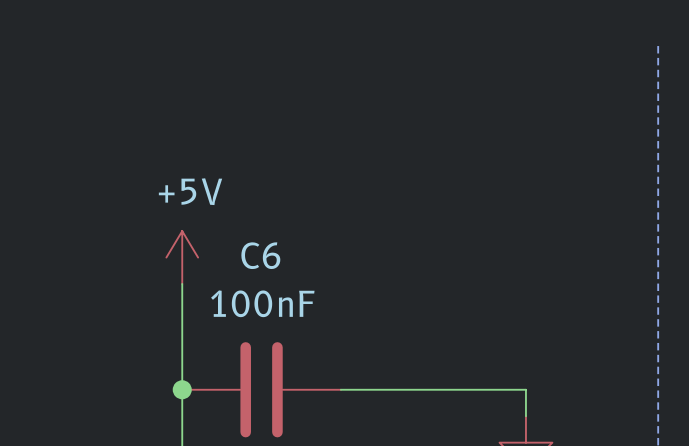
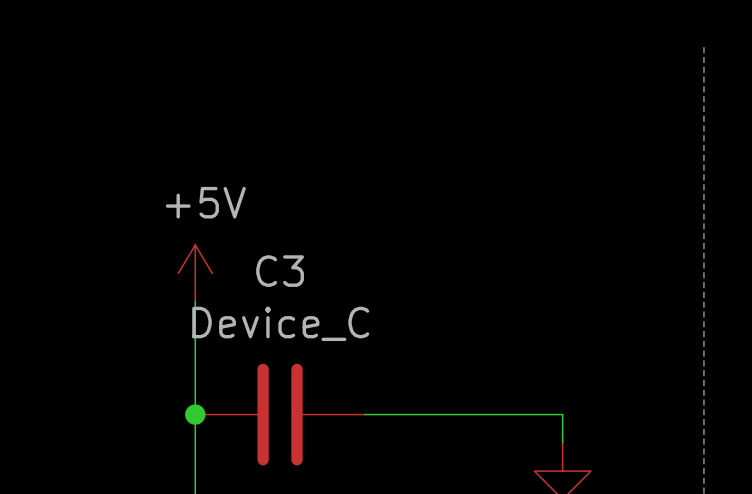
C6 name: C6 (260, 255) -> C3 (280, 271)
C6 value: 100nF (262, 303) -> Device_C (280, 323)

